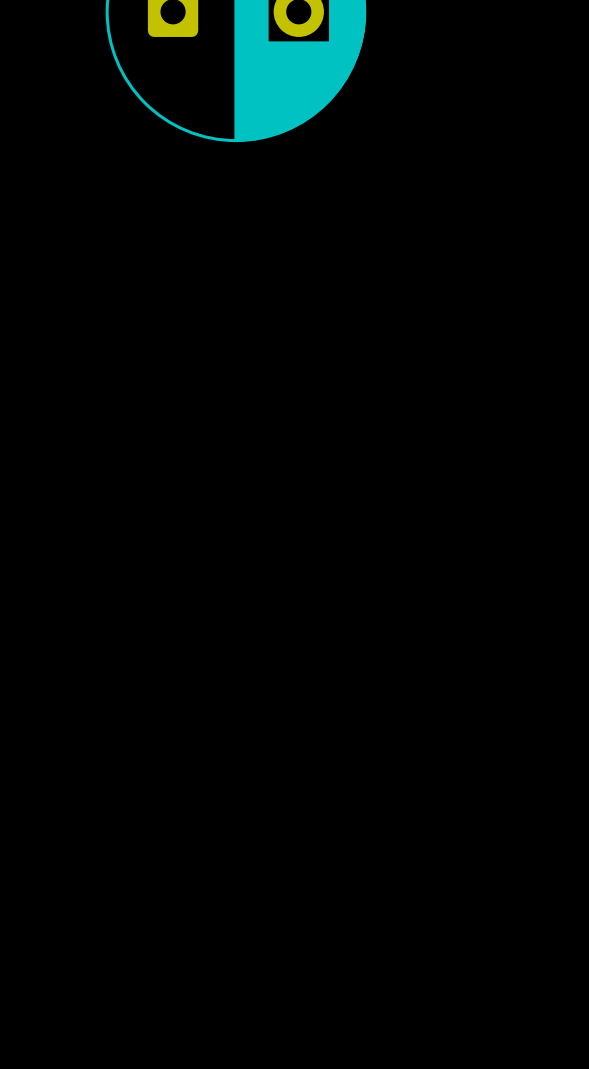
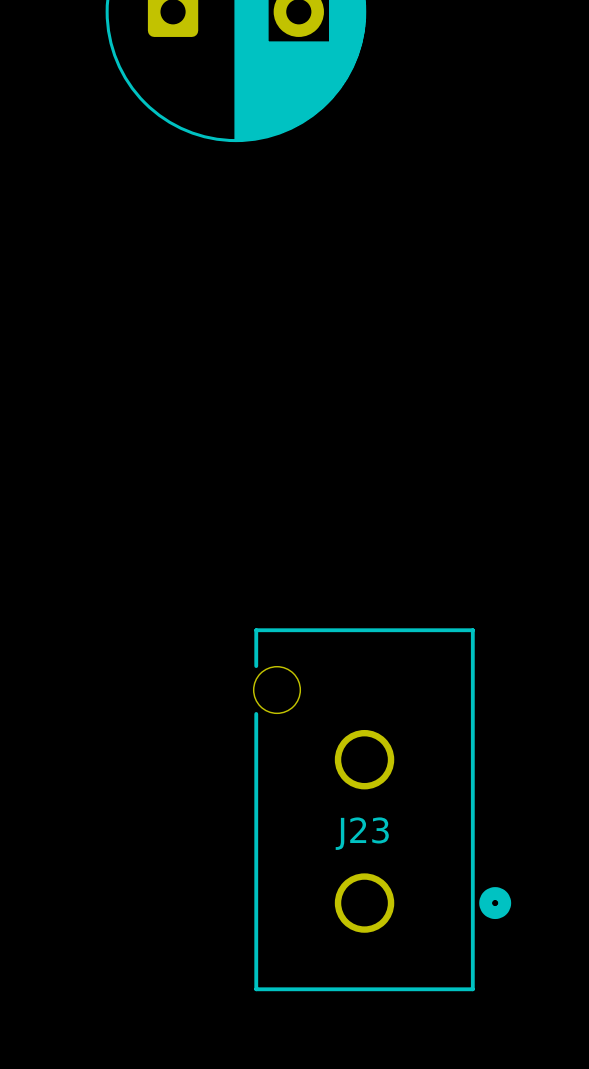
J23: none -> (382, 809)

